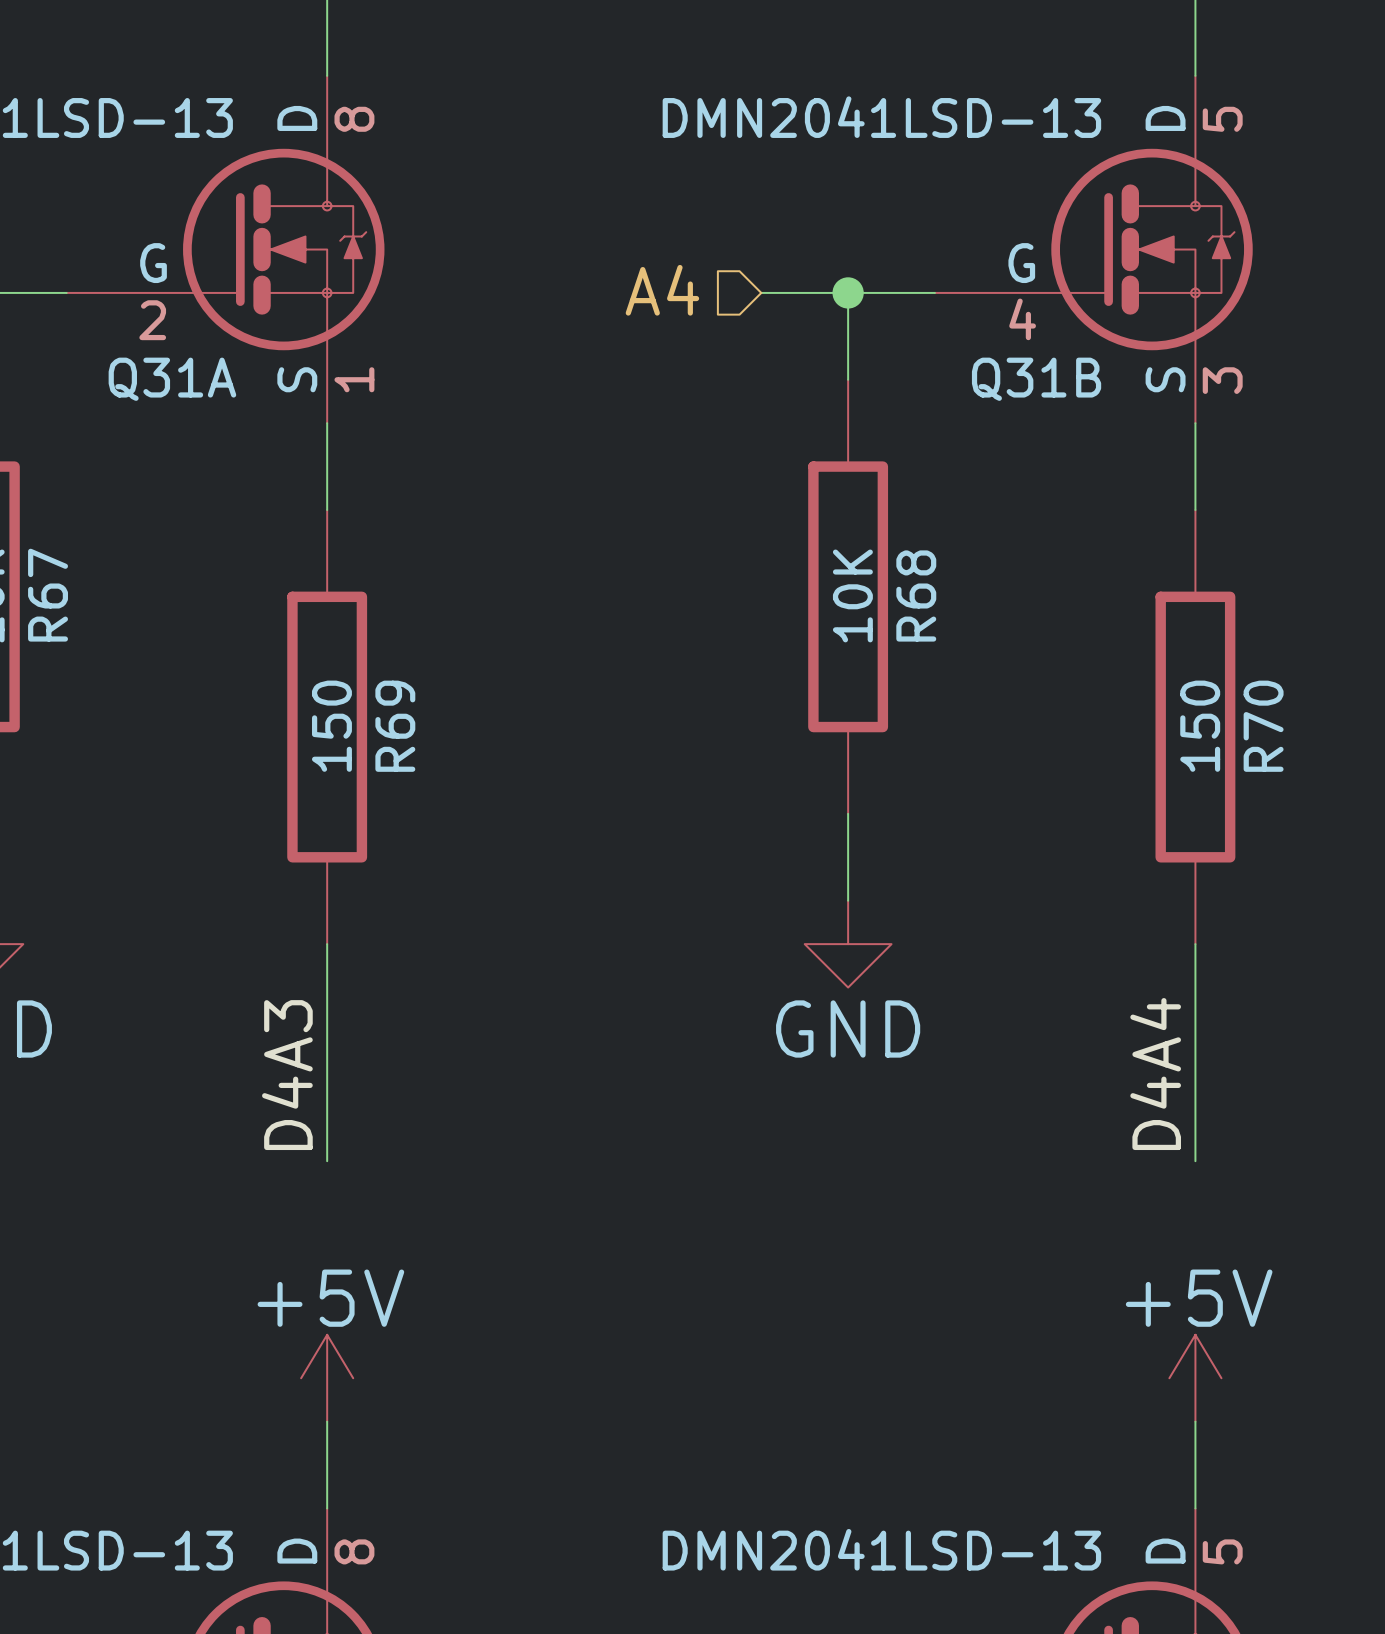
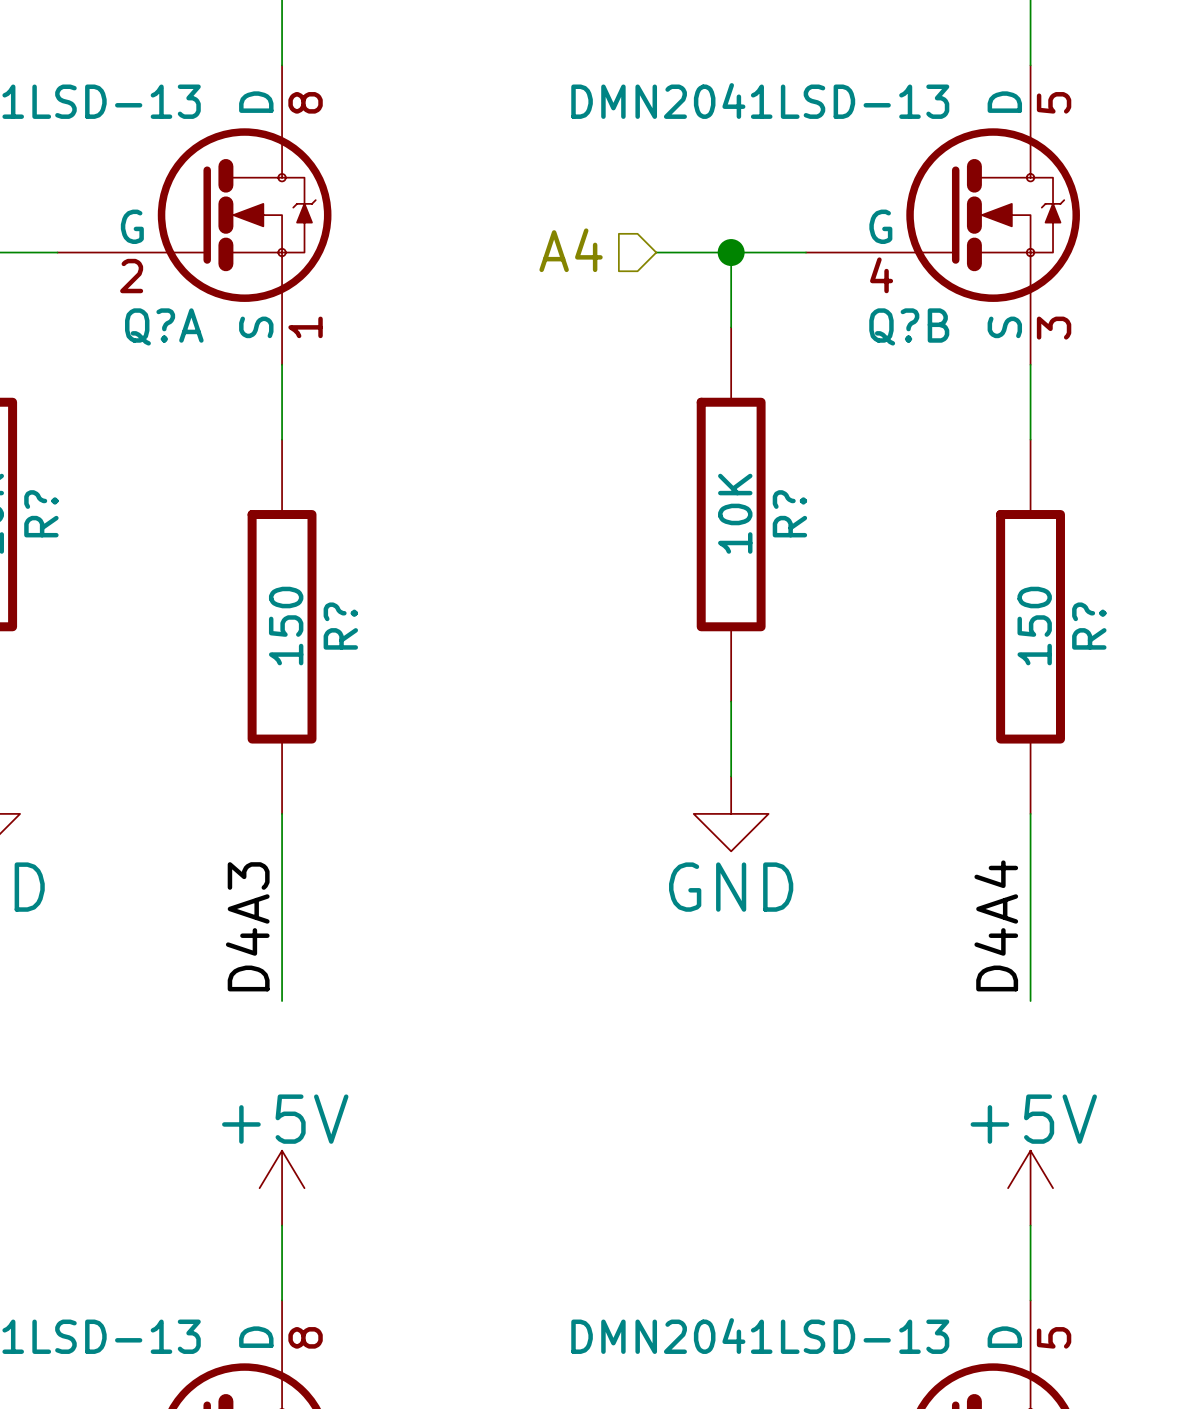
Q31A name: Q31A (172, 379) -> Q?A (164, 326)
Q31B name: Q31B (1036, 379) -> Q?B (909, 326)
R67 name: R67 (48, 595) -> R? (41, 513)
R68 name: R68 (916, 595) -> R? (789, 513)
R69 name: R69 (395, 726) -> R? (340, 626)
R70 name: R70 (1263, 726) -> R? (1089, 626)

